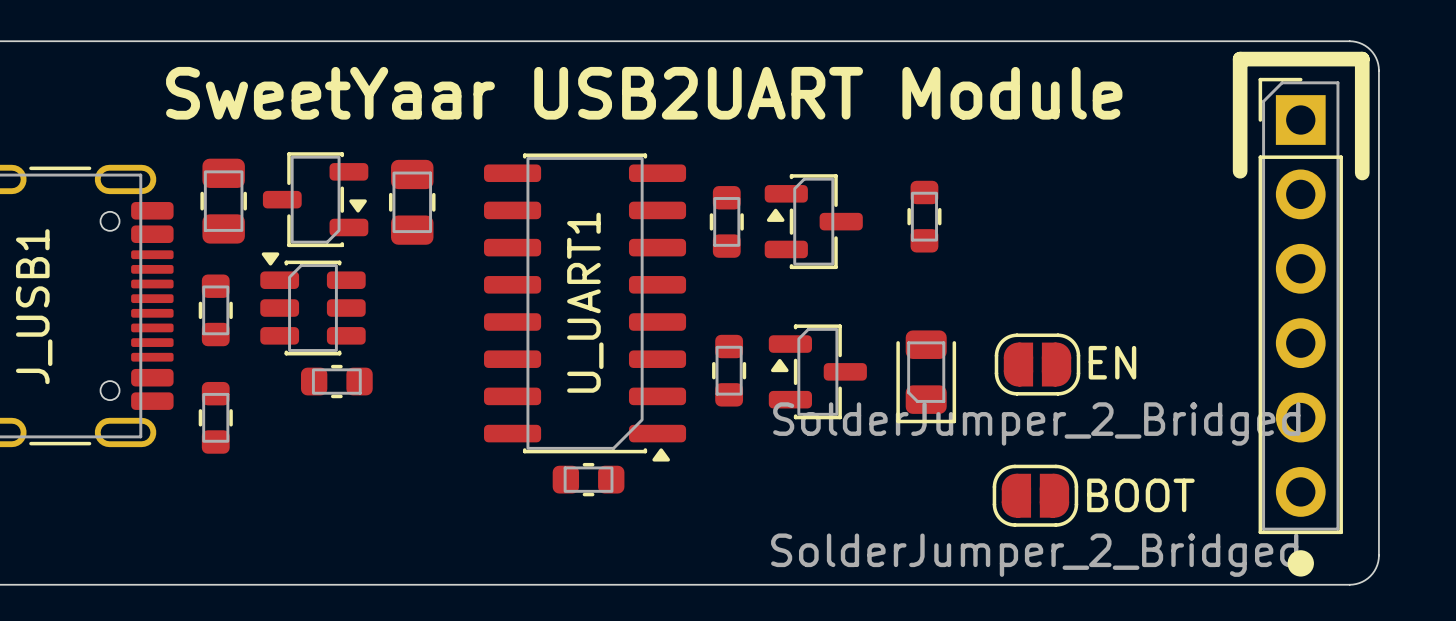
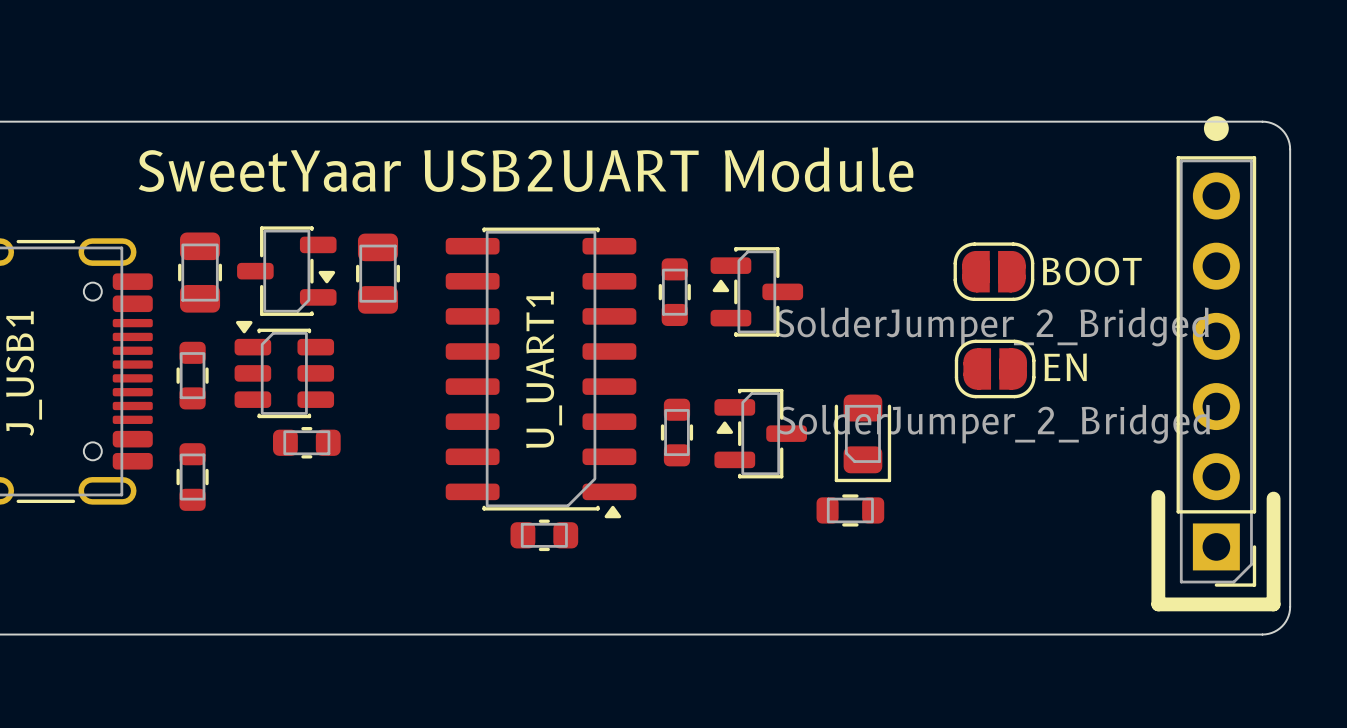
line: (1240, 171) (1240, 59) (1362, 59) (1362, 173) -> none
part: none -> SolderJumper_2_Bridged (993, 271)
part rotation: 0° (924, 216) -> 90° clockwise (850, 510)
part position: (924, 216) -> (850, 510)
part rotation: 0° (1300, 305) -> 180° (1216, 371)
text position: EN (1112, 362) -> EN (1065, 367)
part position: (1037, 364) -> (995, 368)
line: none -> (1158, 496) (1158, 604) (1273, 604) (1273, 498)
part: SolderJumper_2_Bridged (1035, 495) -> none
text position: BOOT (1140, 495) -> BOOT (1092, 271)
drawing position: (1300, 563) -> (1216, 128)

